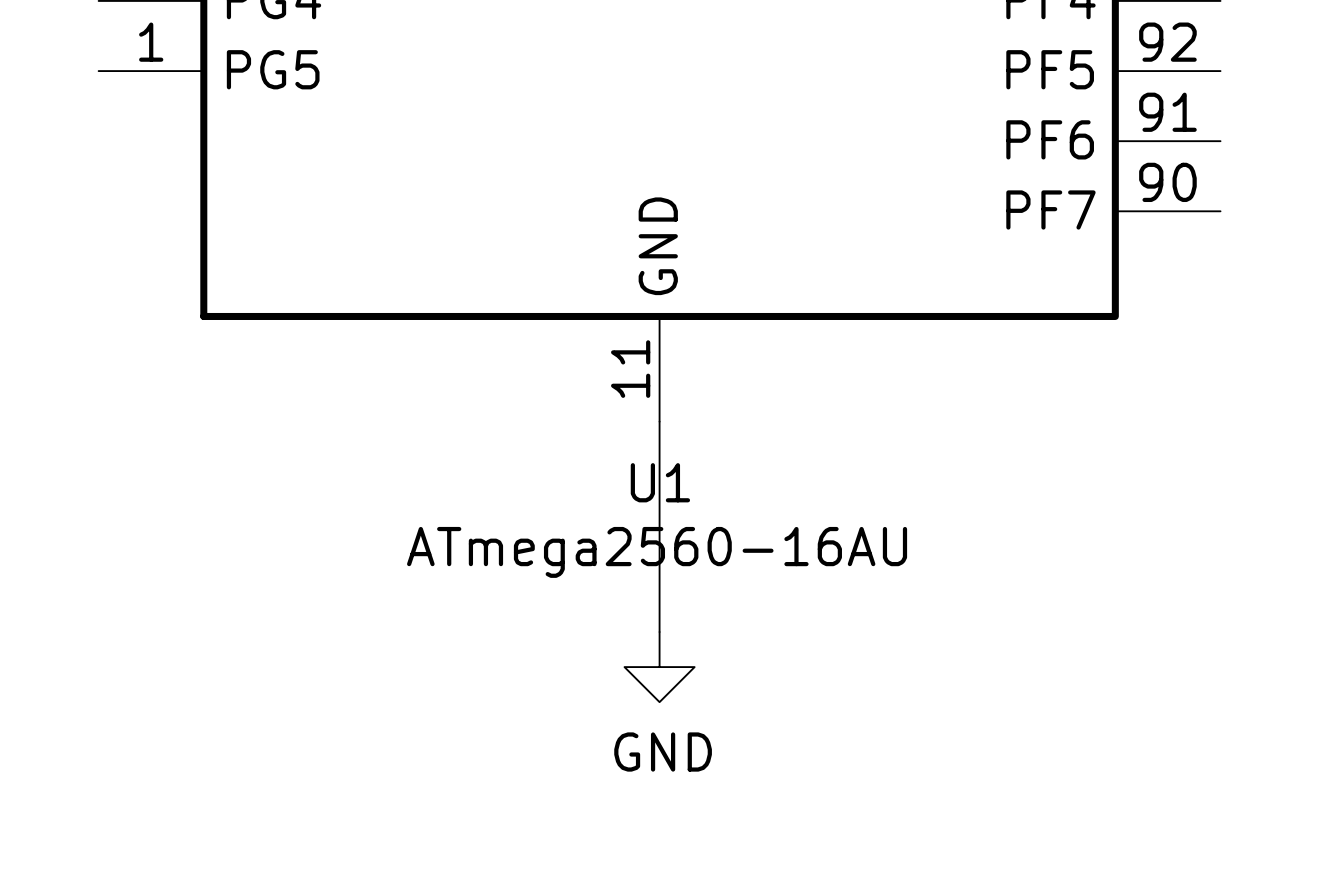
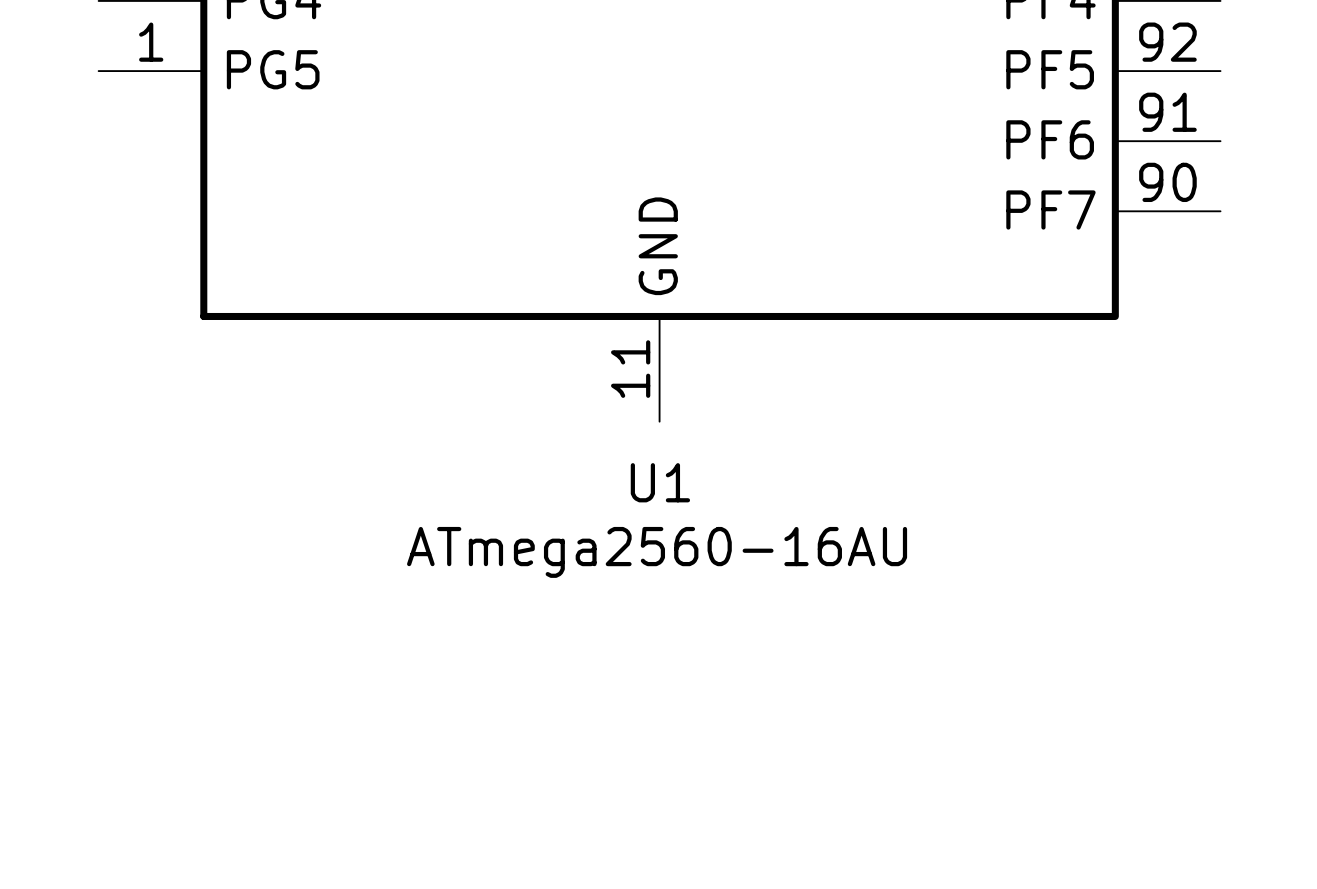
wire: (659, 421) (659, 632) -> none
power symbol: GND (659, 667) -> none

